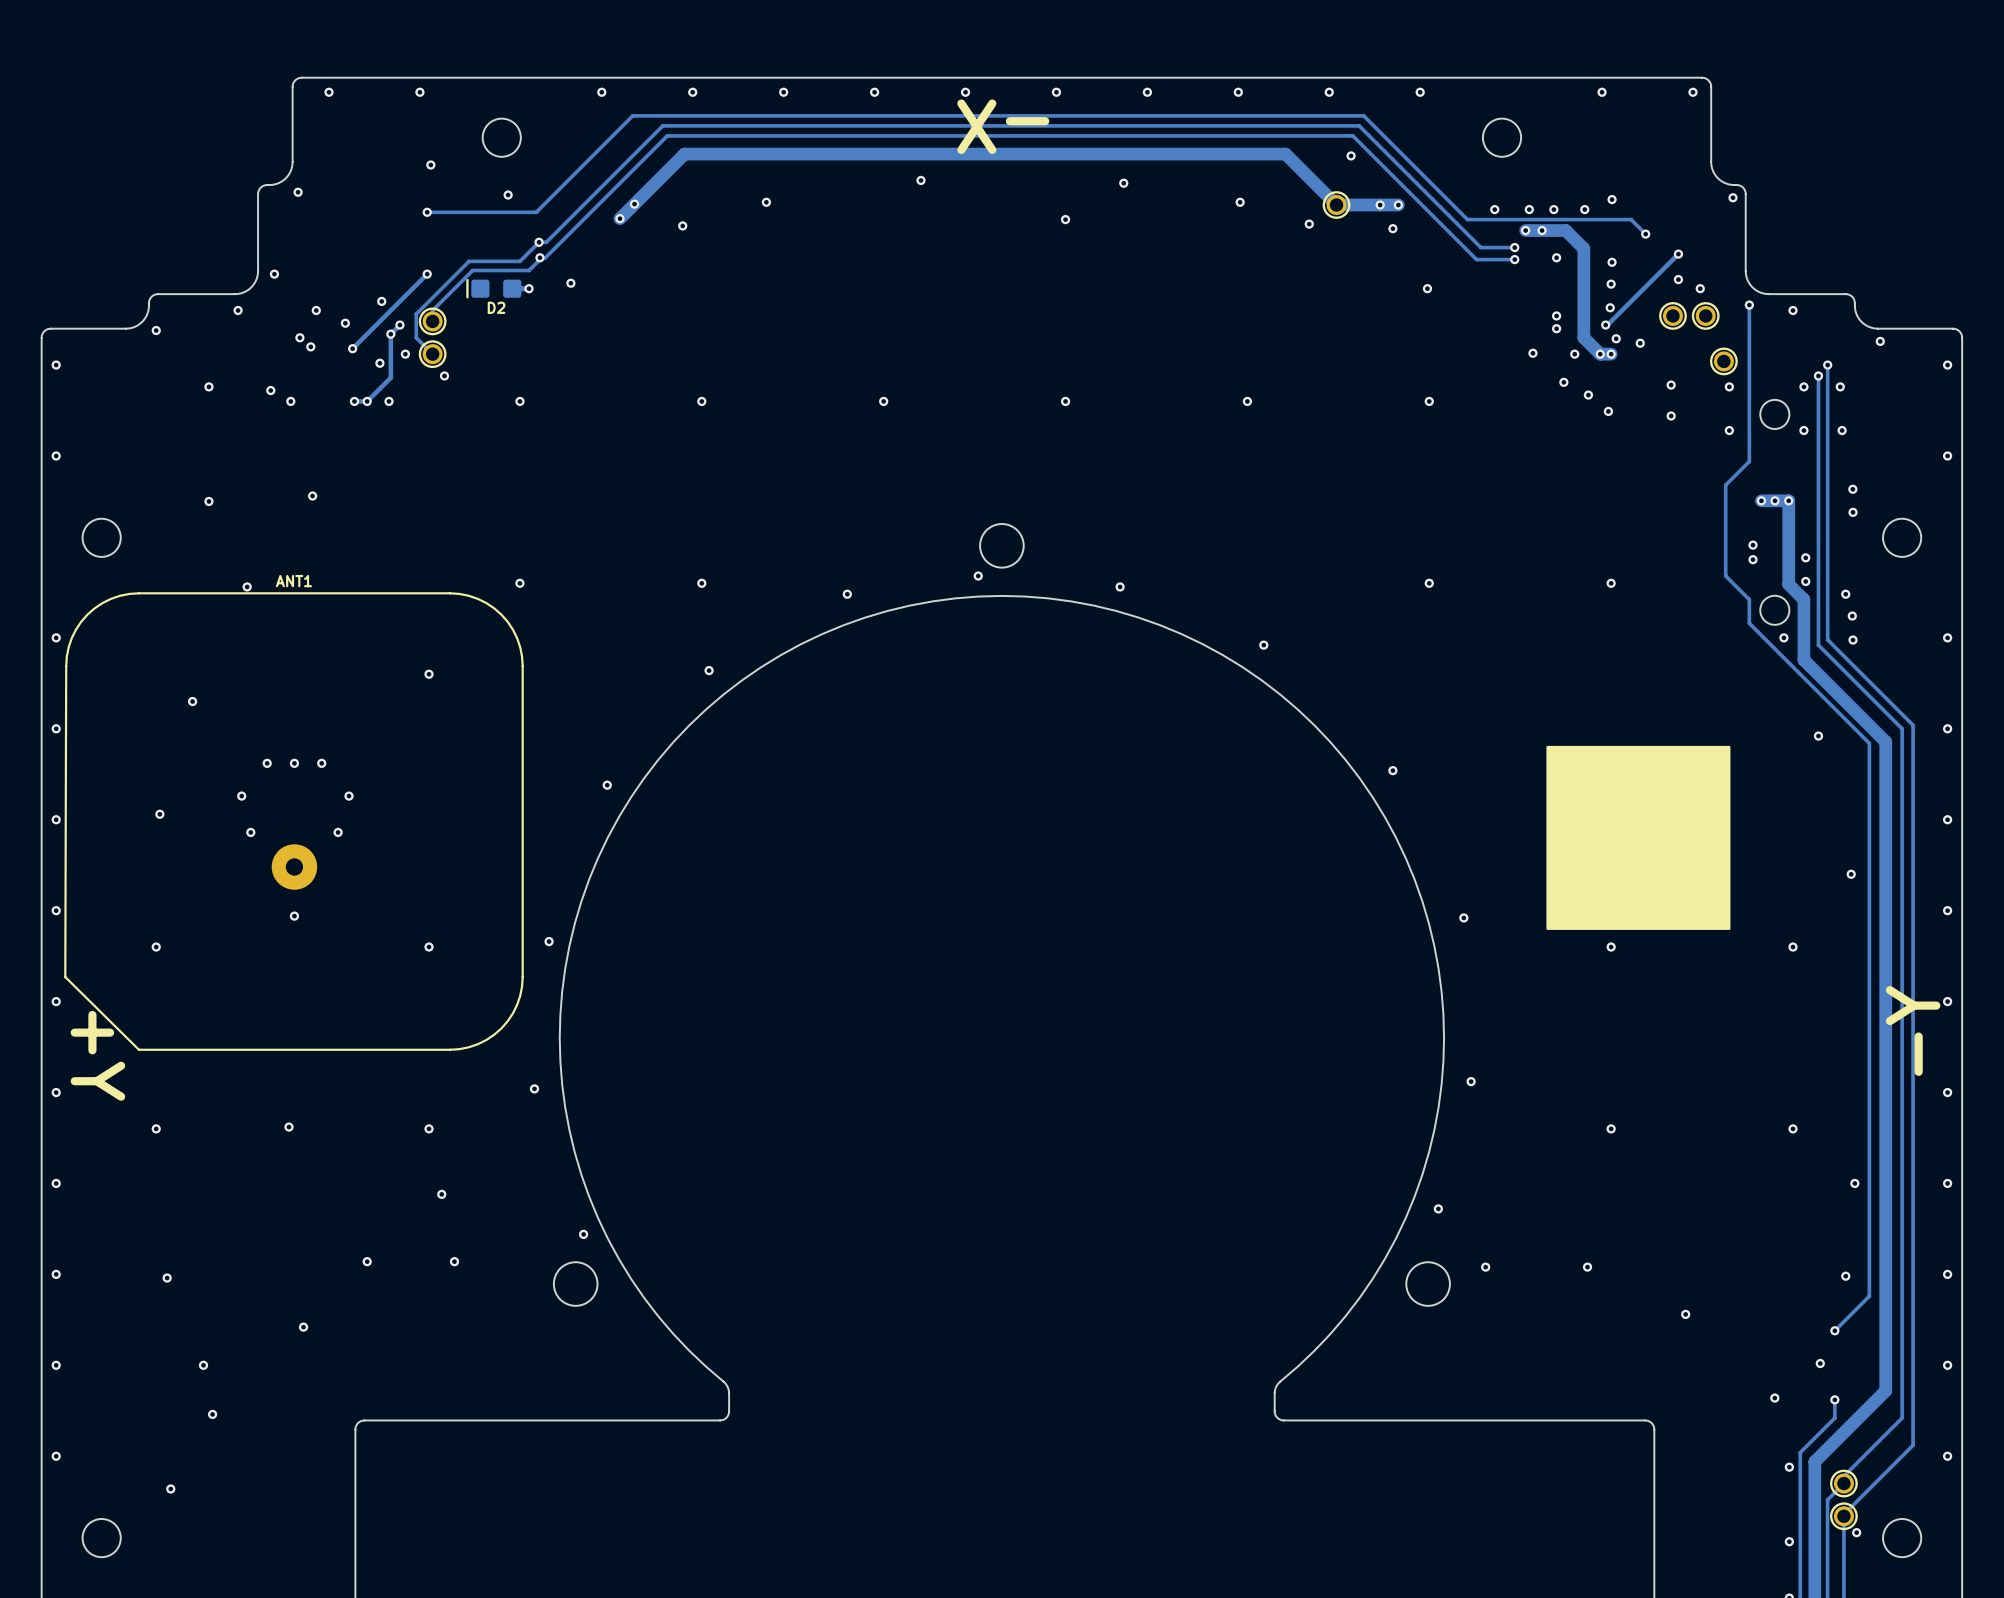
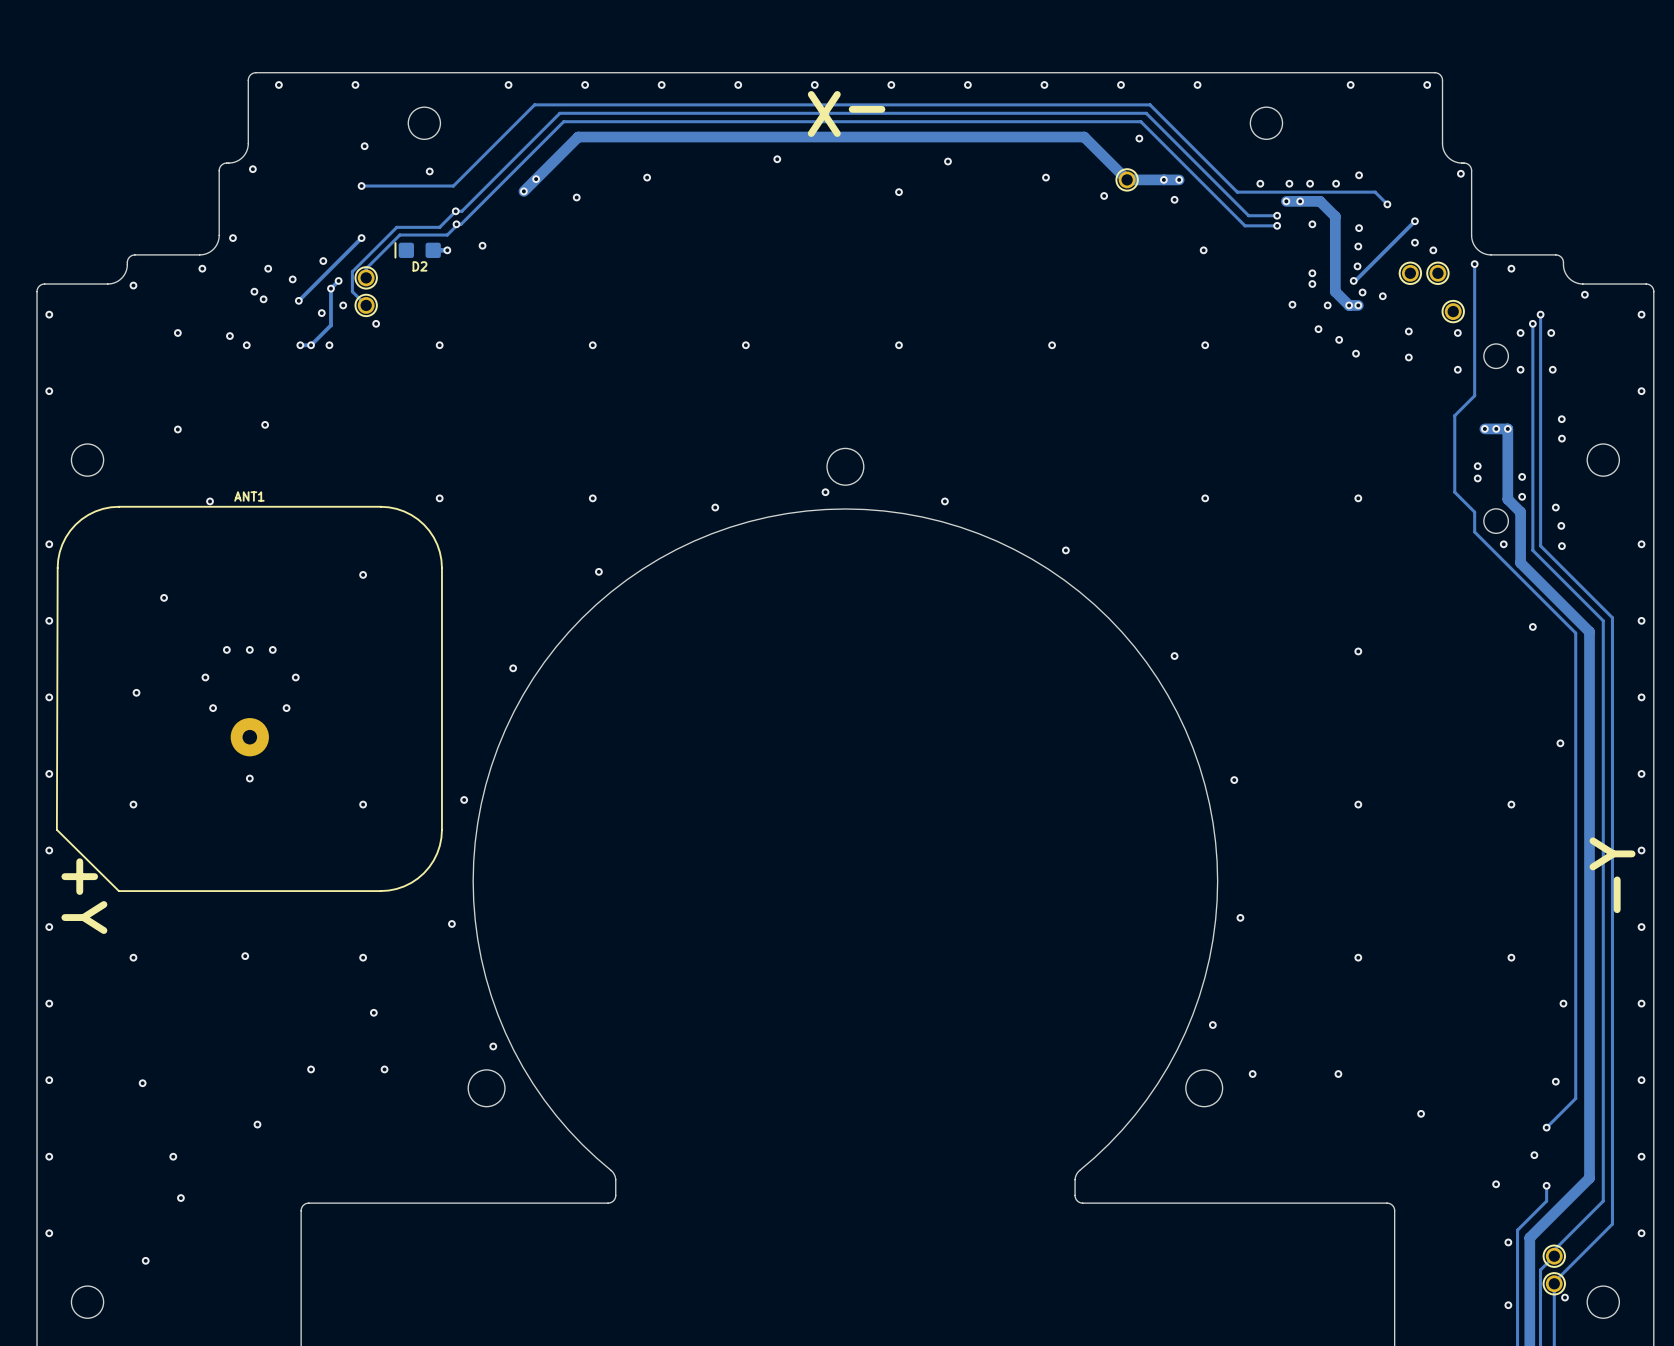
drawing: [1546, 745, 1731, 930] -> none

